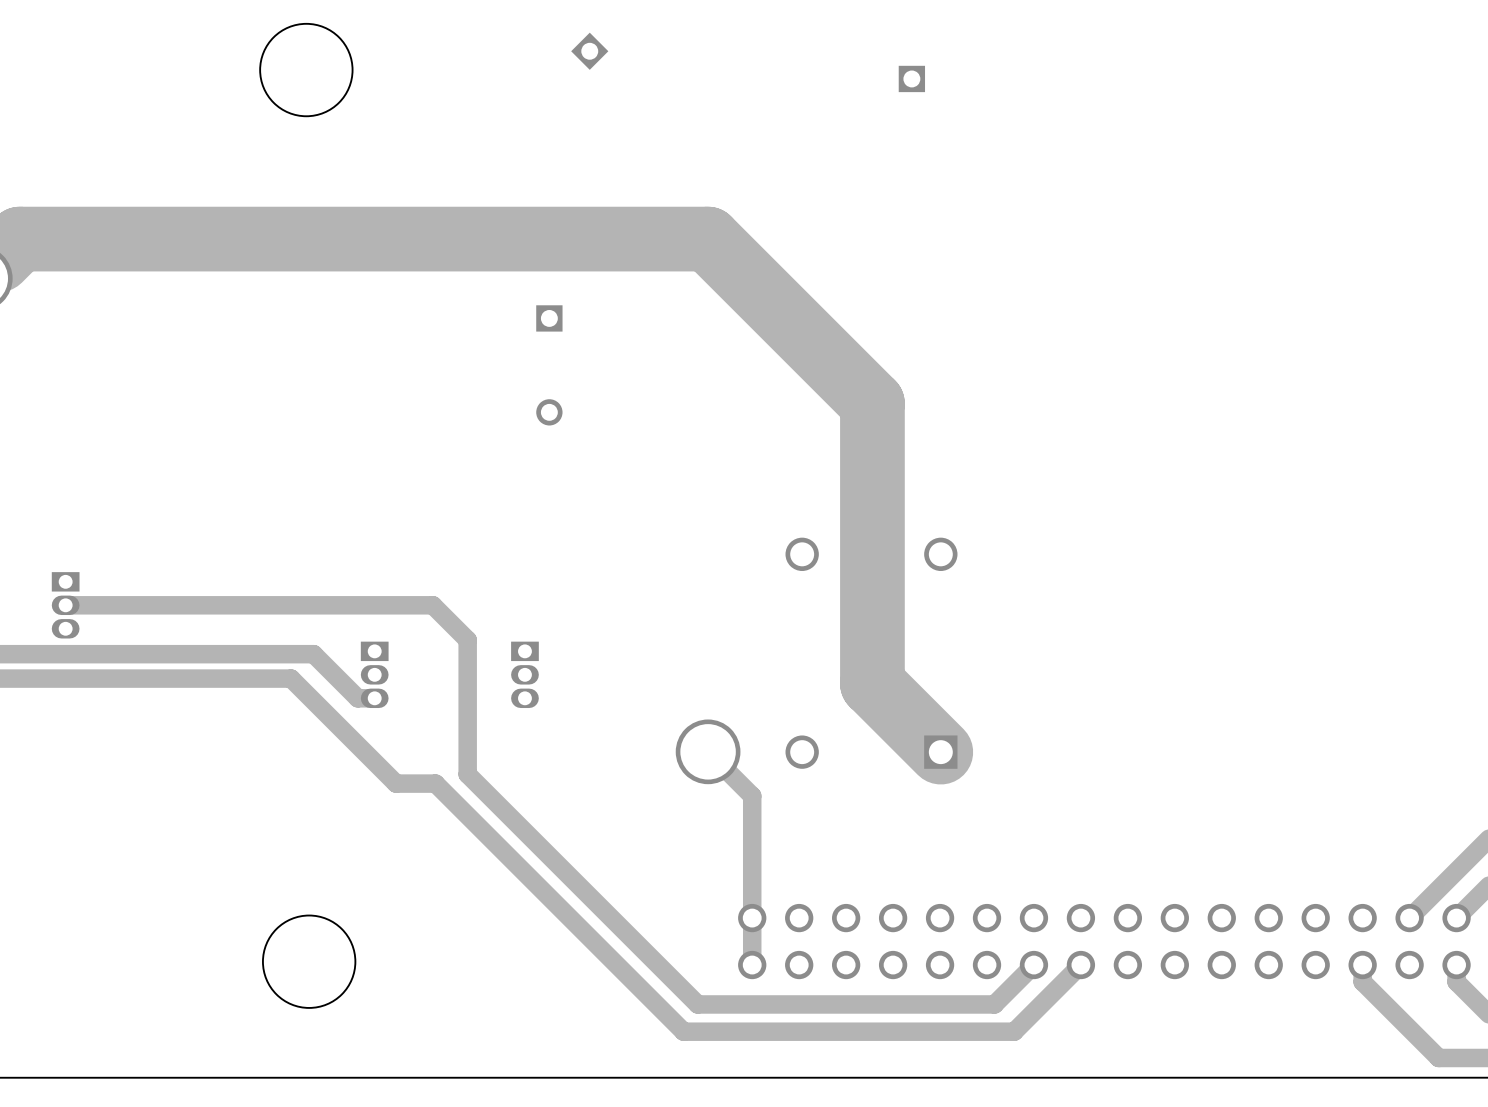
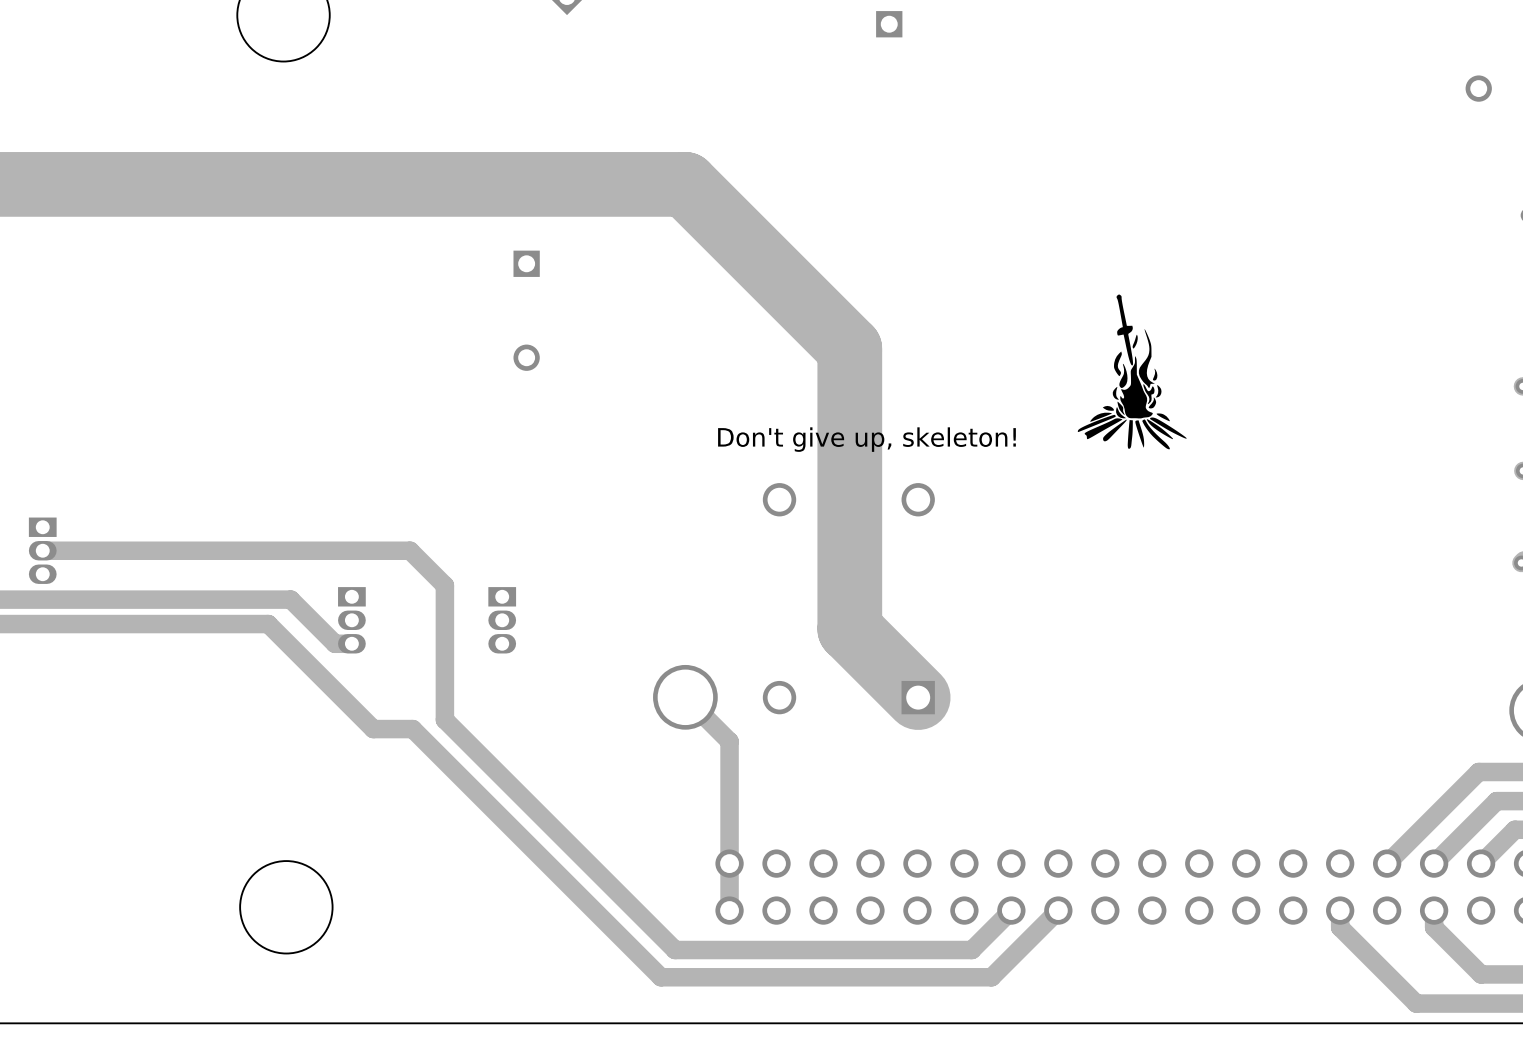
drawing: none -> [1077, 294, 1187, 450]
text: none -> Don't give up, skeleton! (866, 439)

